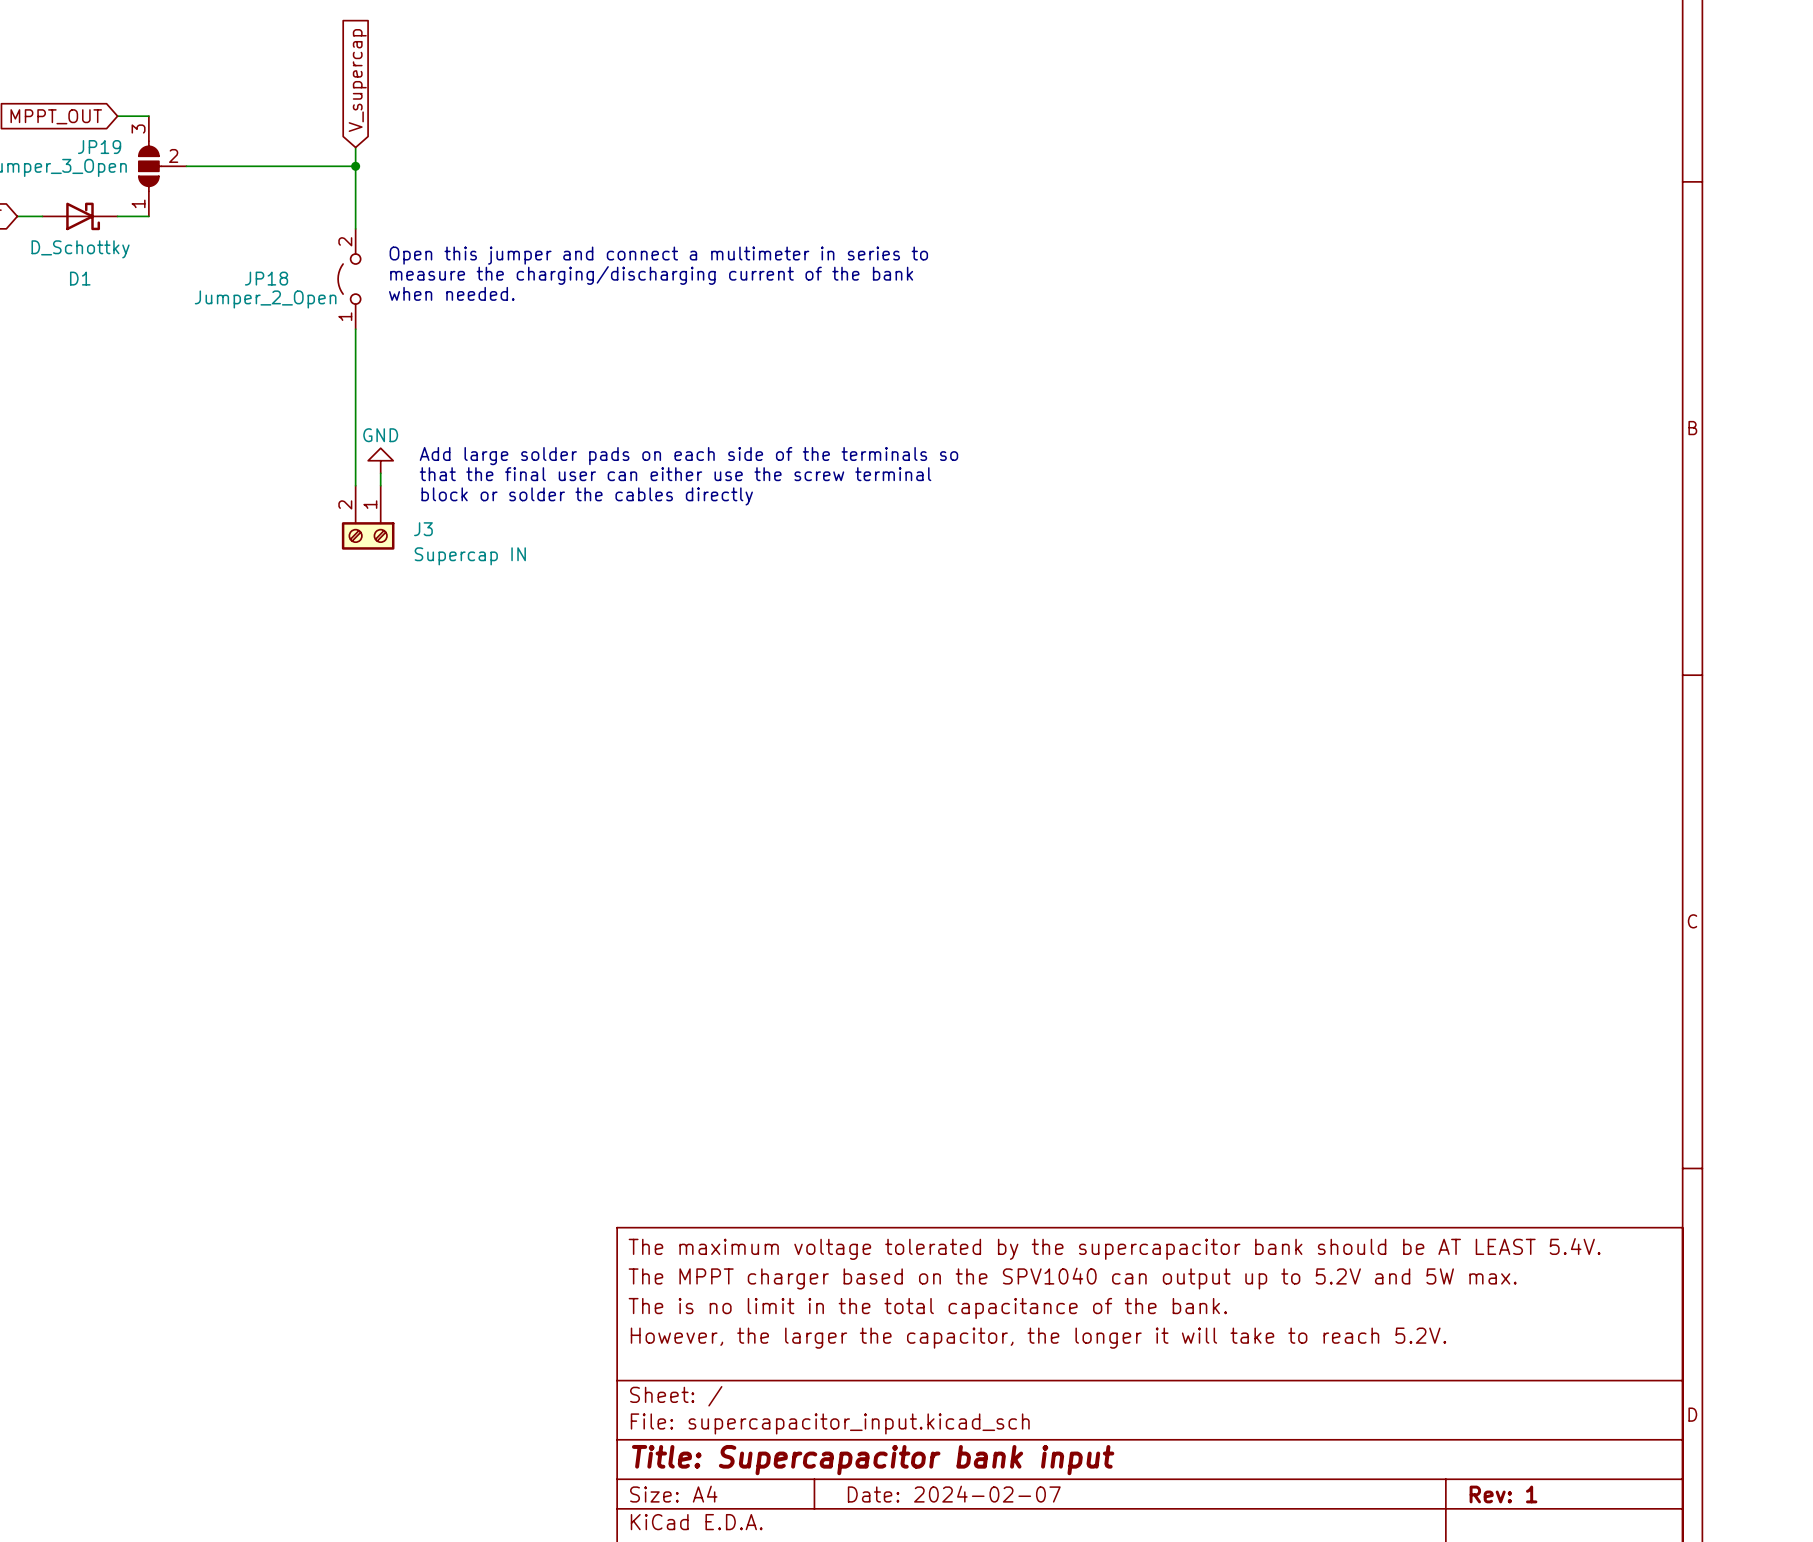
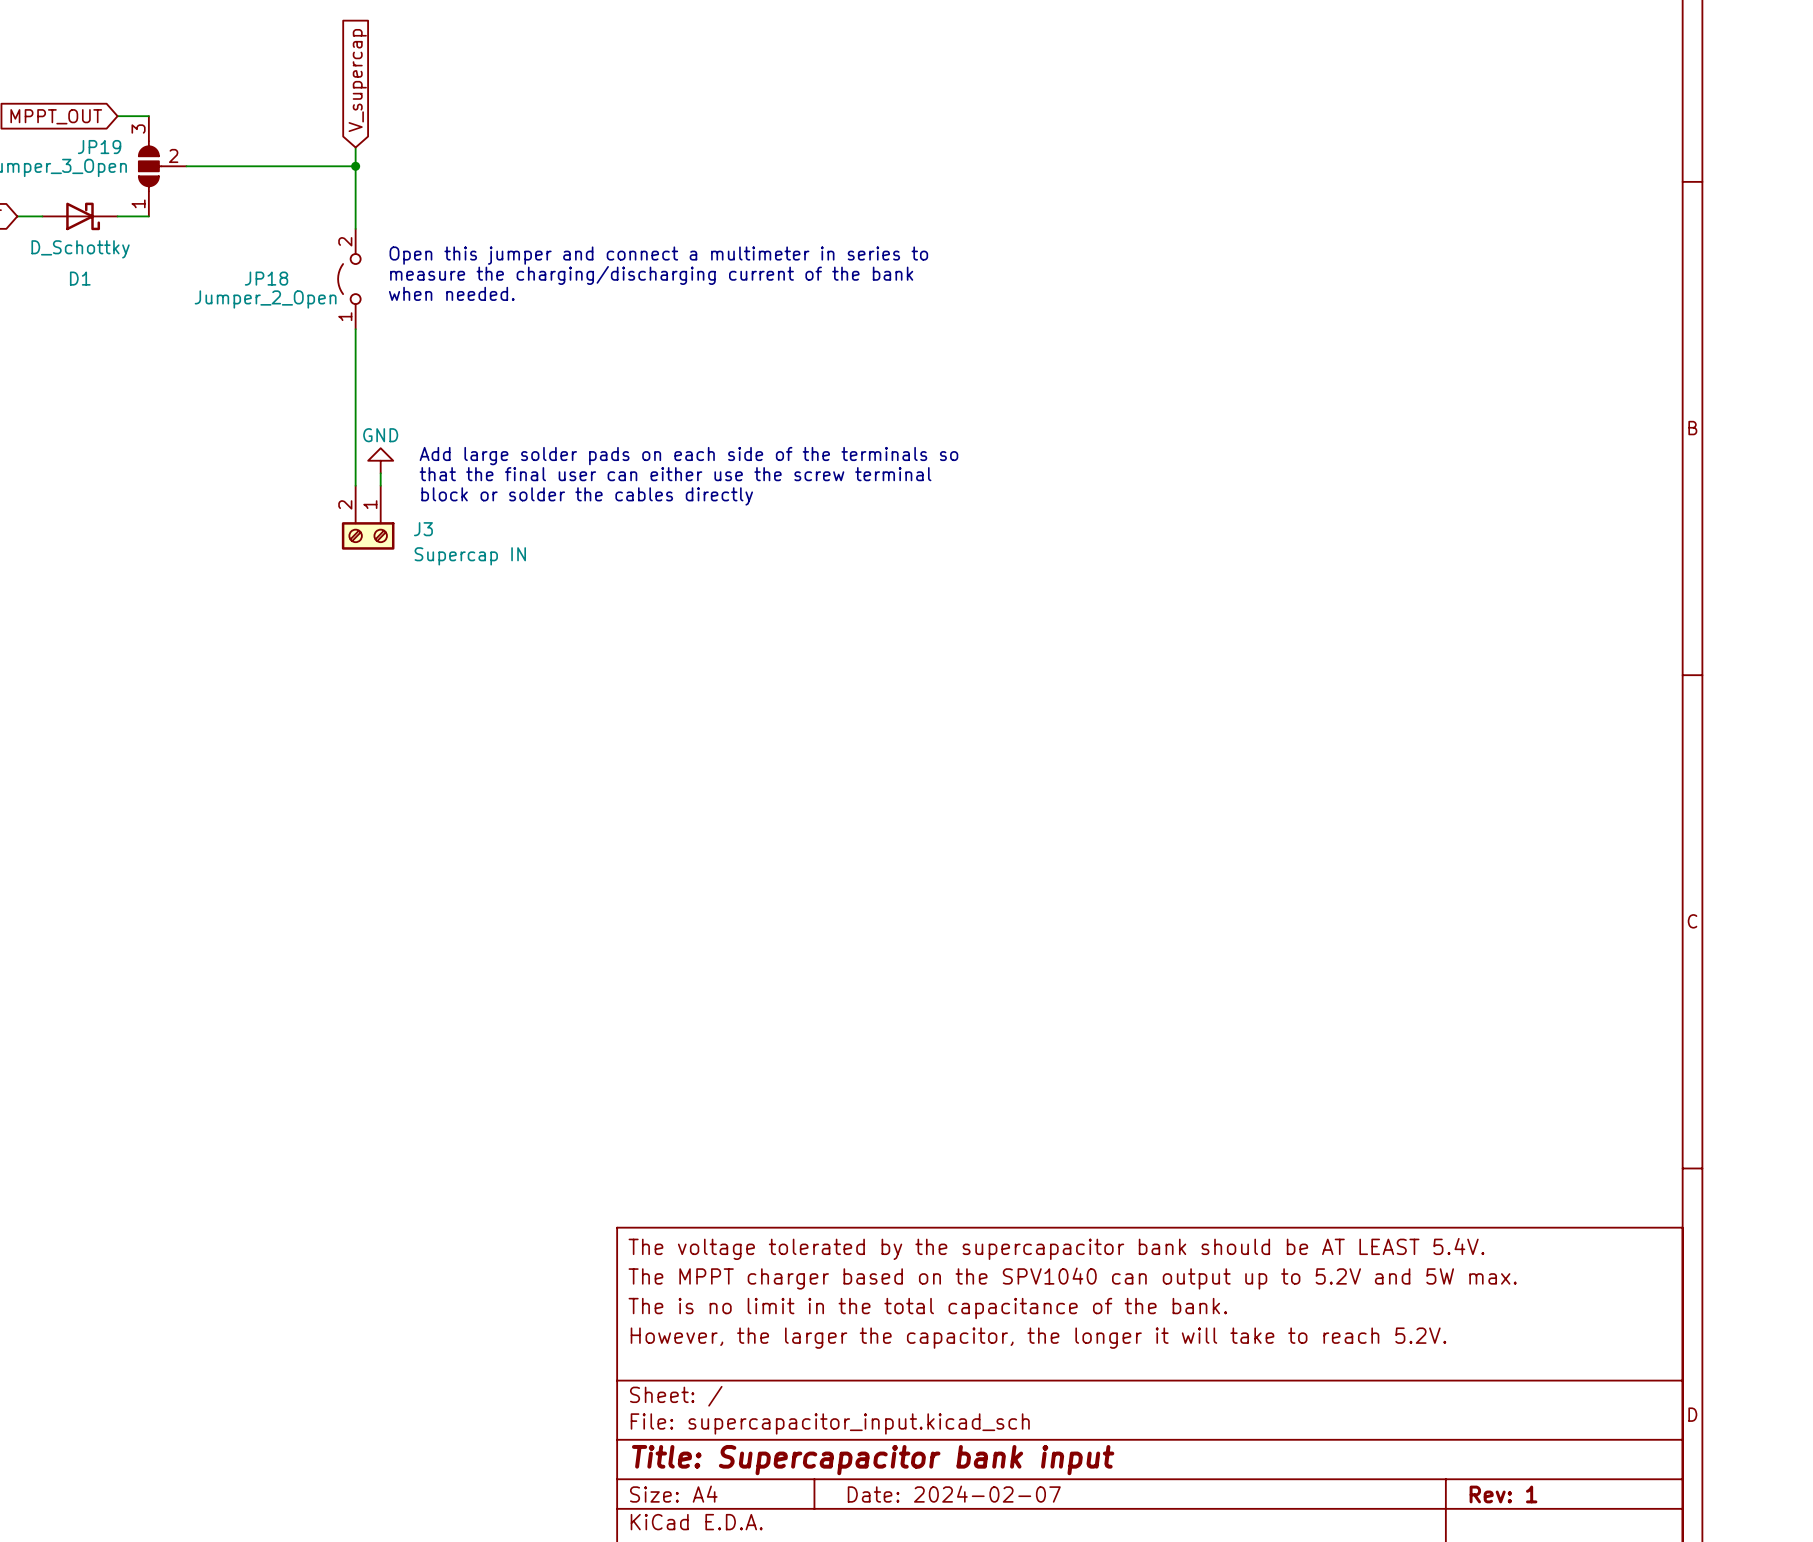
title block: The maximum voltage tolerated by the supercapacitor bank should be AT LEAST 5.4V. (1114, 1248) -> The voltage tolerated by the supercapacitor bank should be AT LEAST 5.4V. (1056, 1248)

